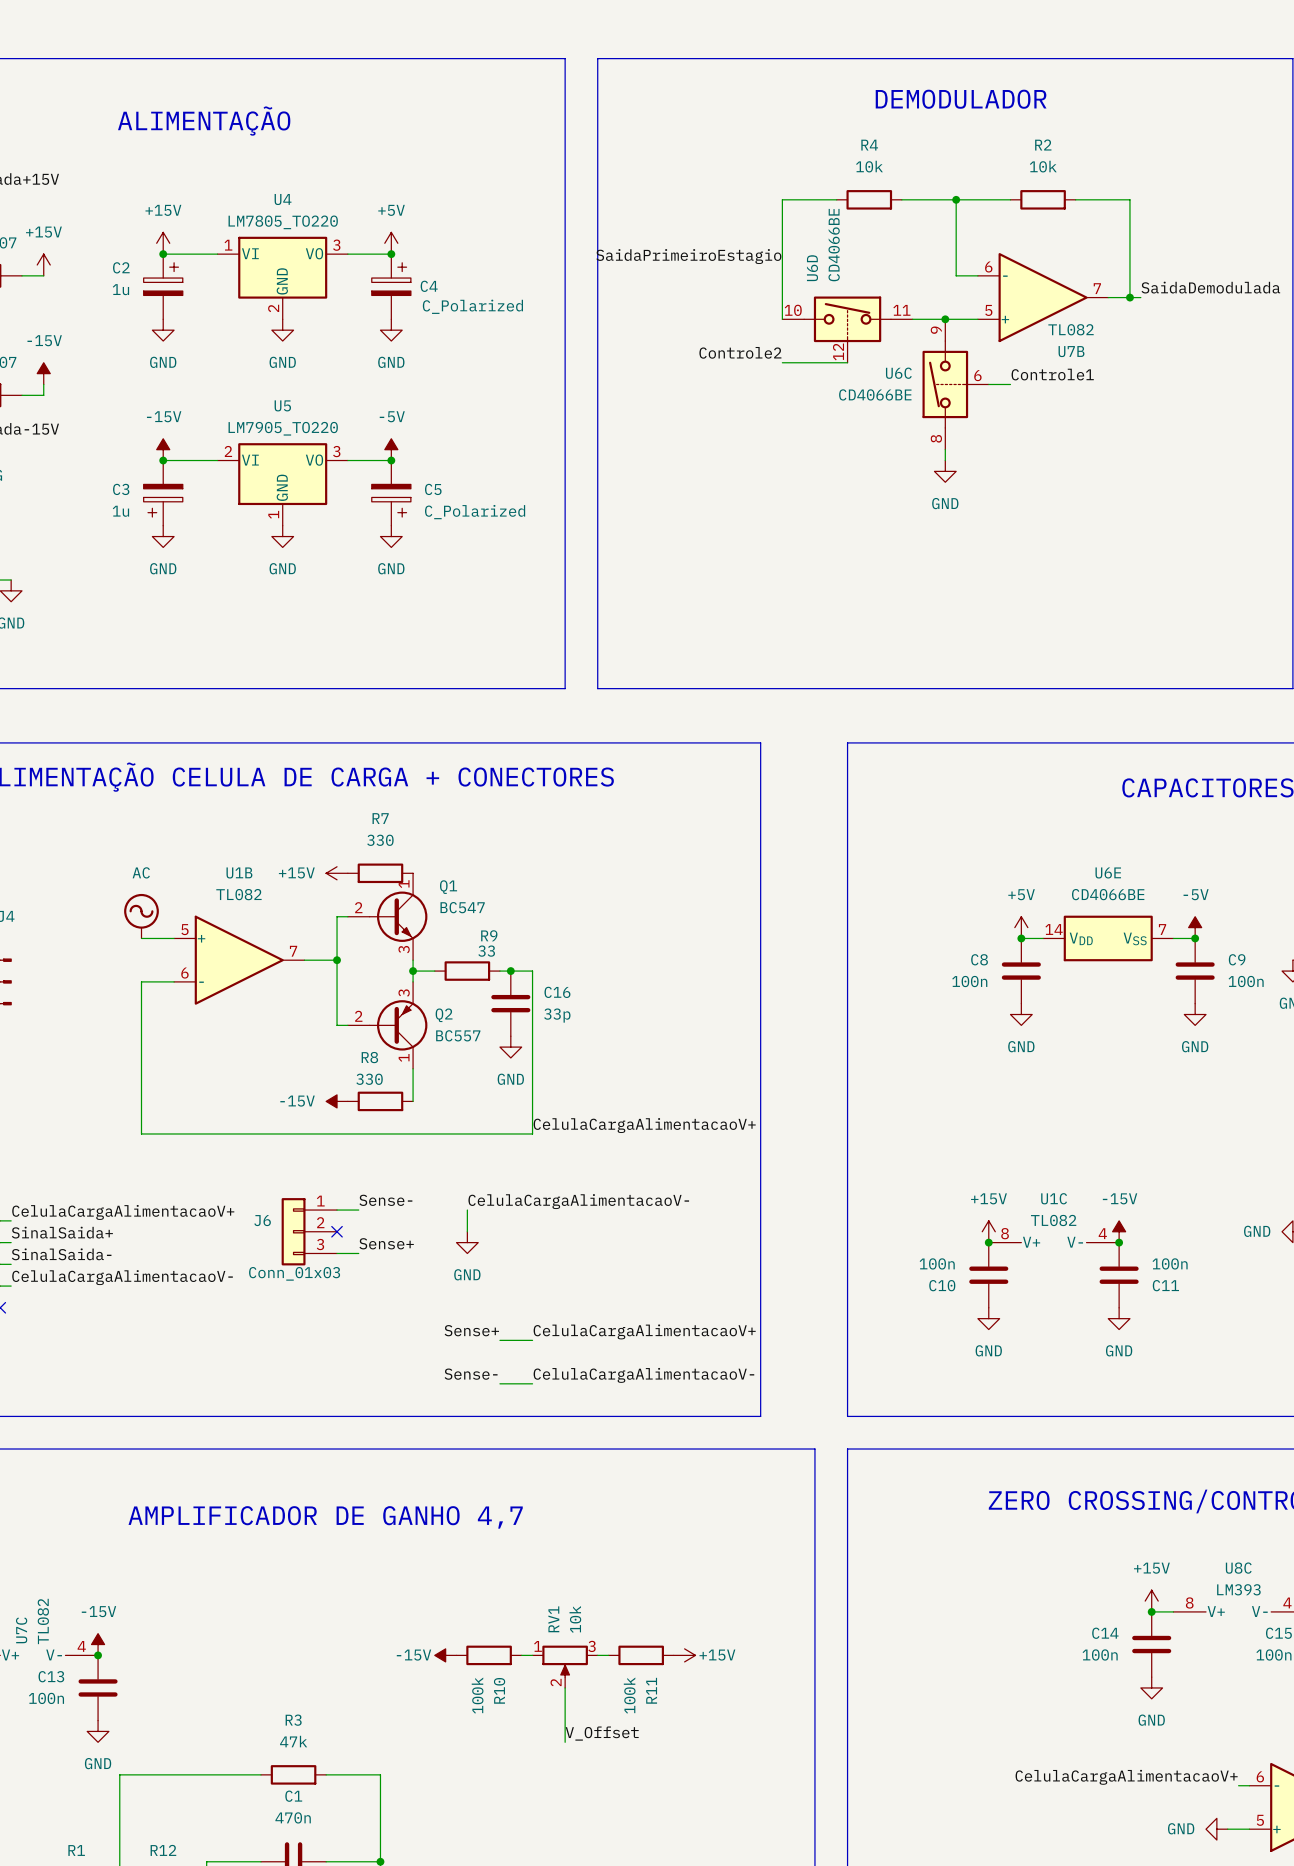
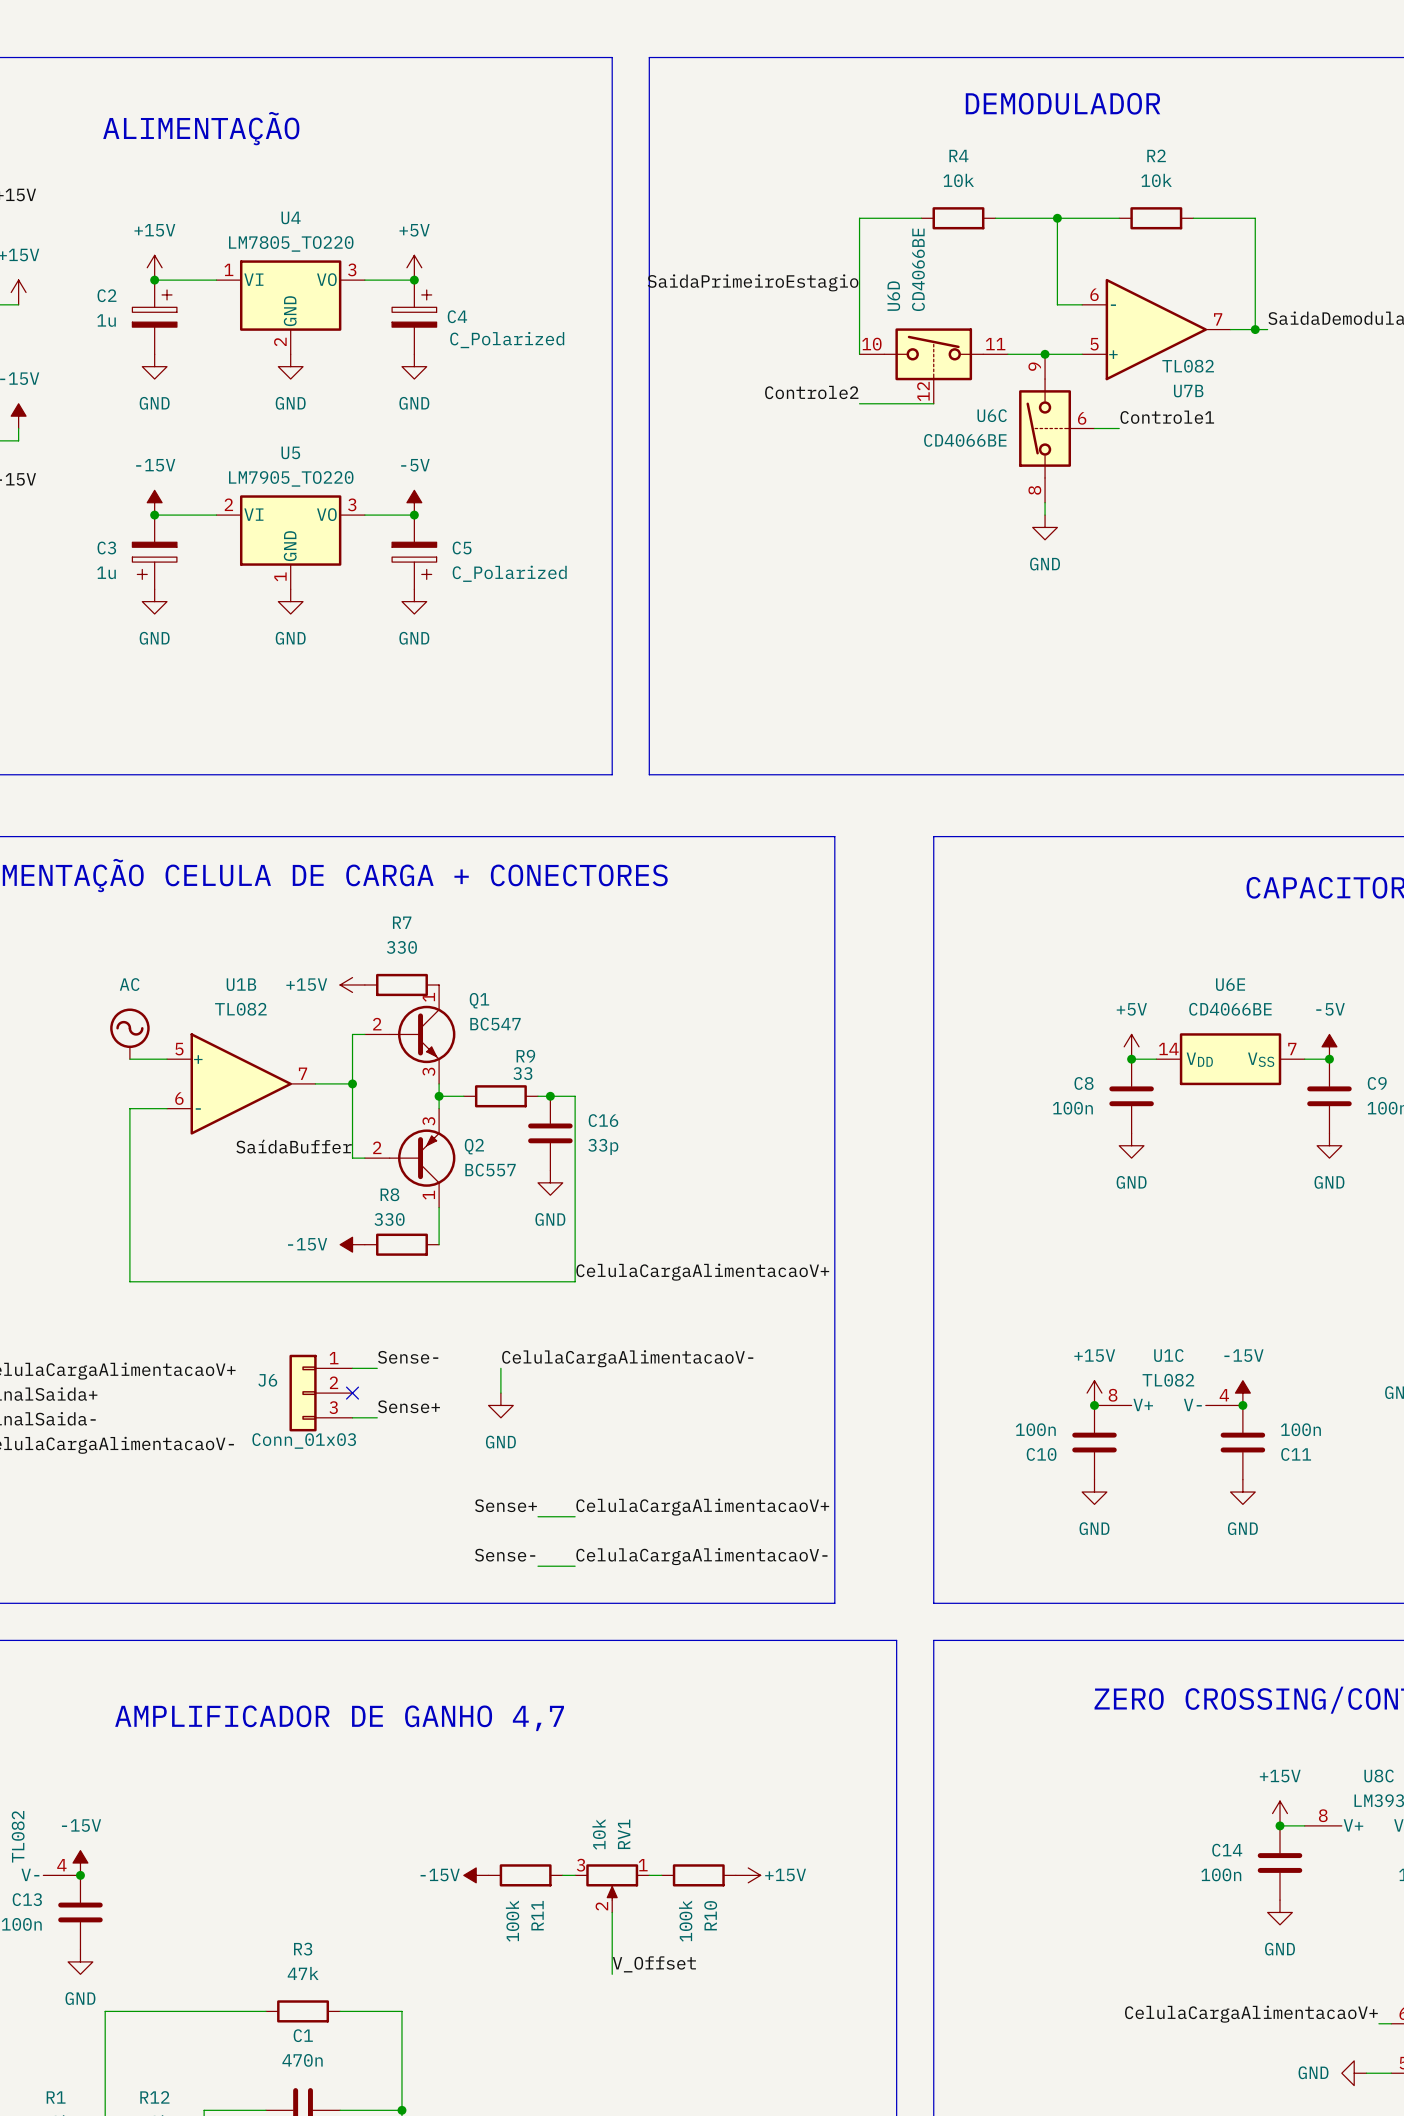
label: none -> SaídaBuffer (294, 1146)
RV1 flip: as is (565, 1661) -> left-right (612, 1882)
R10 name: R10 (499, 1690) -> R11 (537, 1915)
R11 name: R11 (651, 1690) -> R10 (710, 1915)

